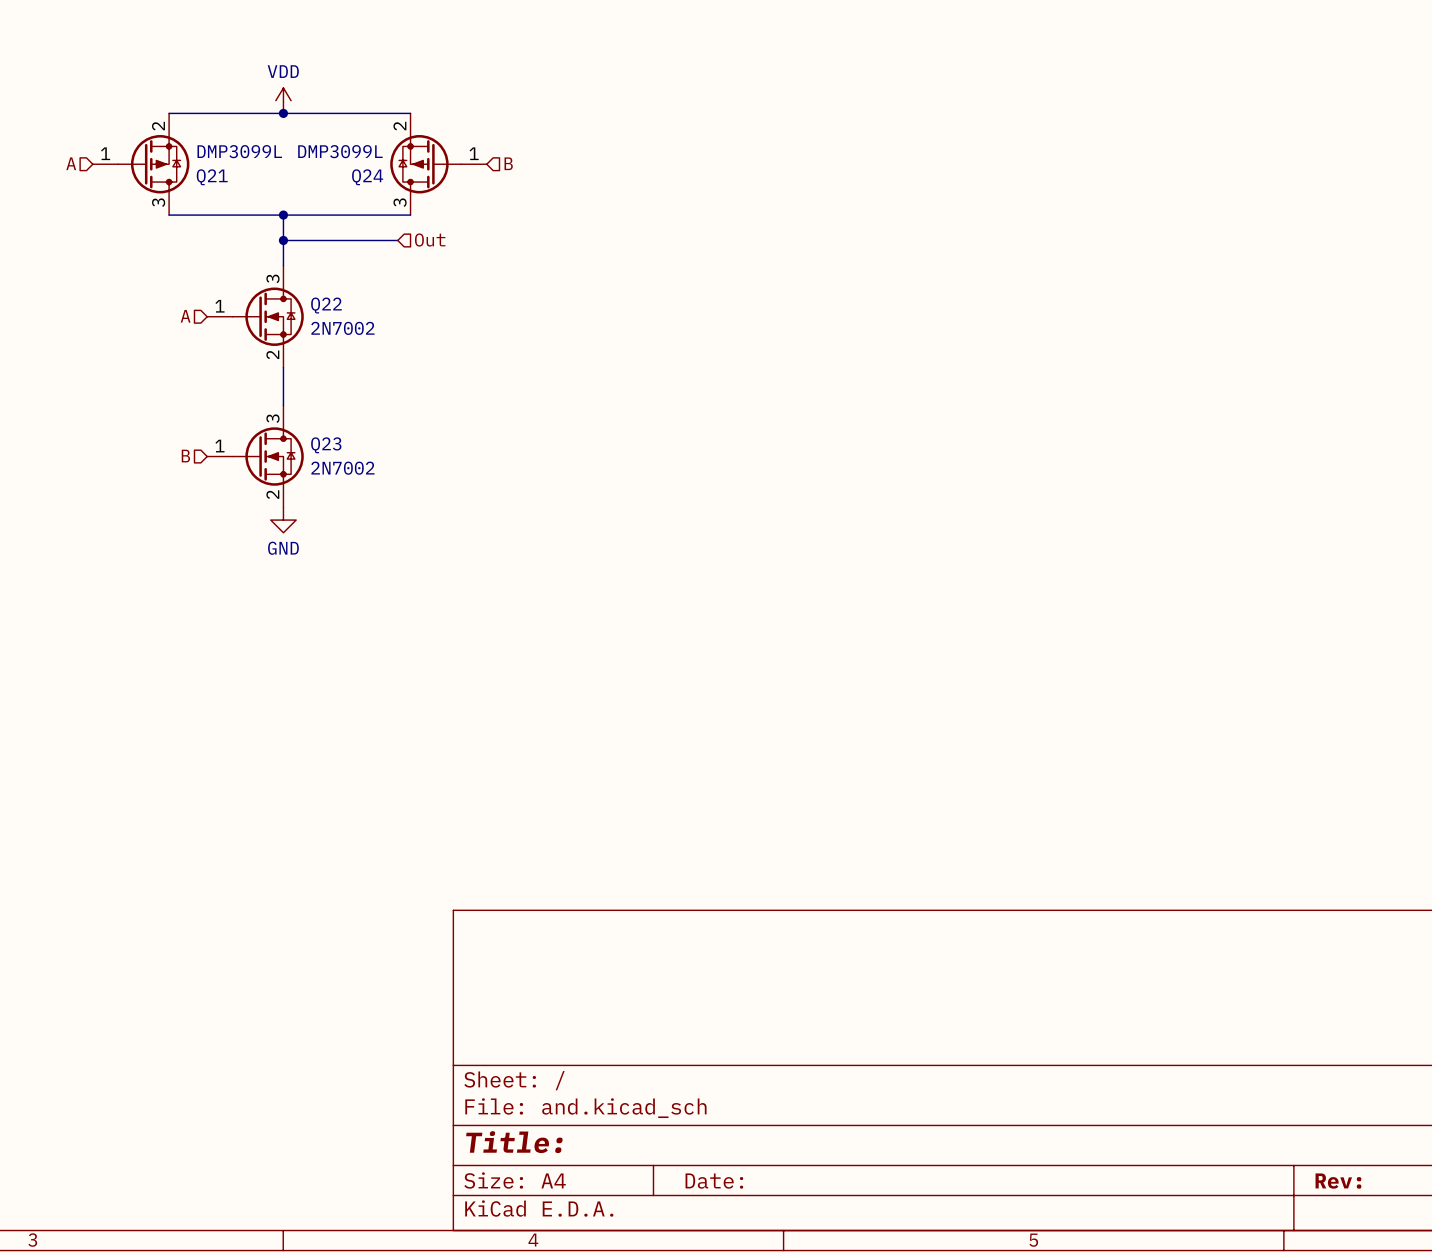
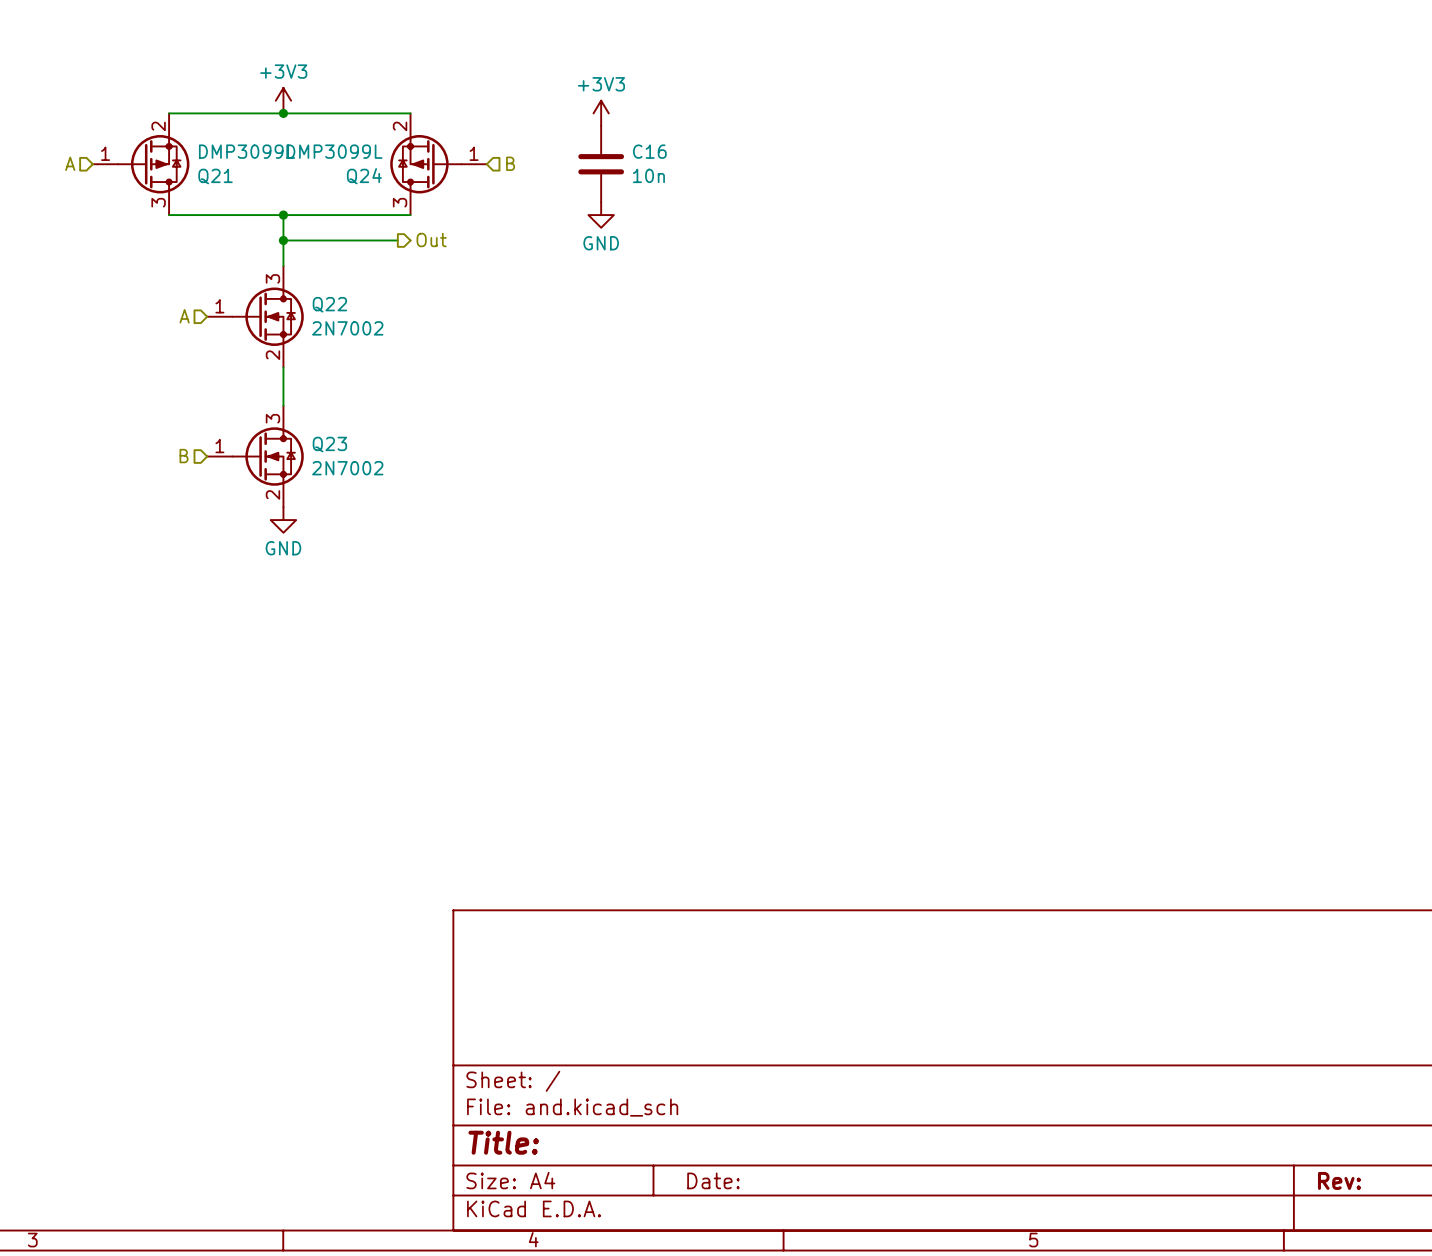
power symbol: VDD (283, 100) -> +3V3 (283, 100)
power symbol: none -> +3V3 (601, 113)
C16: none -> 10n (601, 164)
power symbol: none -> GND (601, 215)
hierarchical label shape: input (430, 240) -> output (431, 240)

